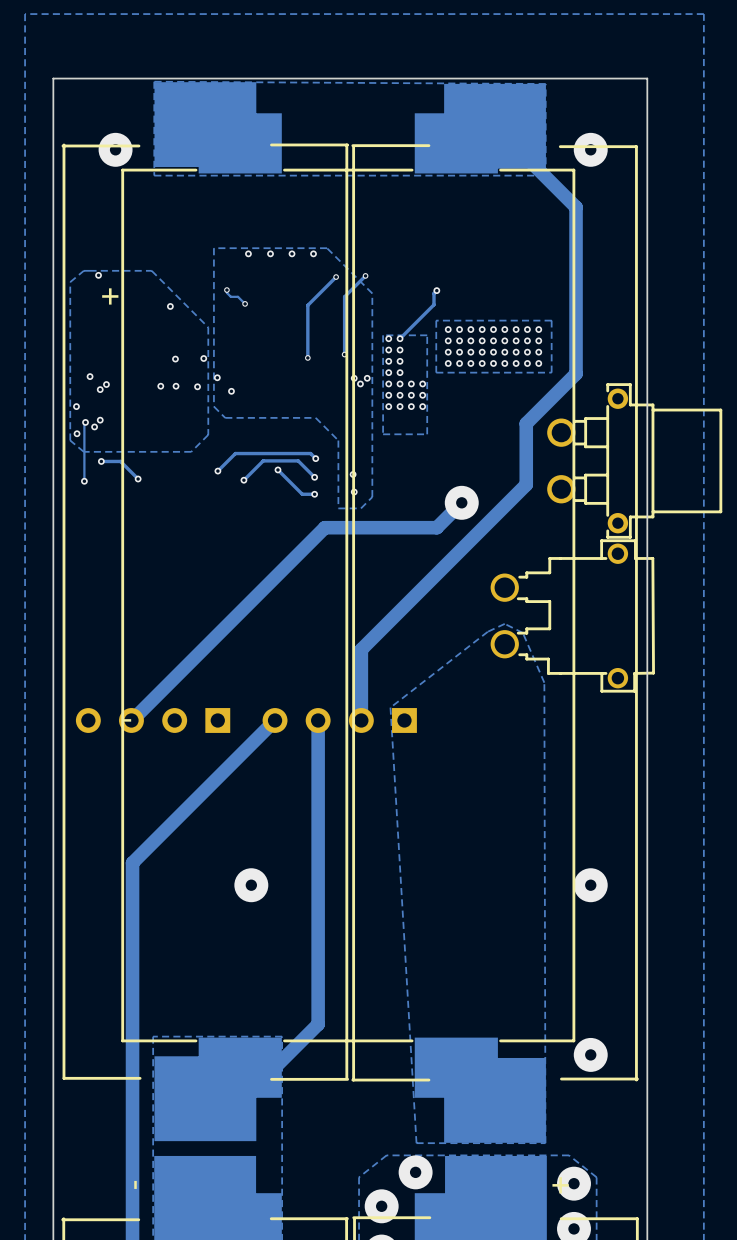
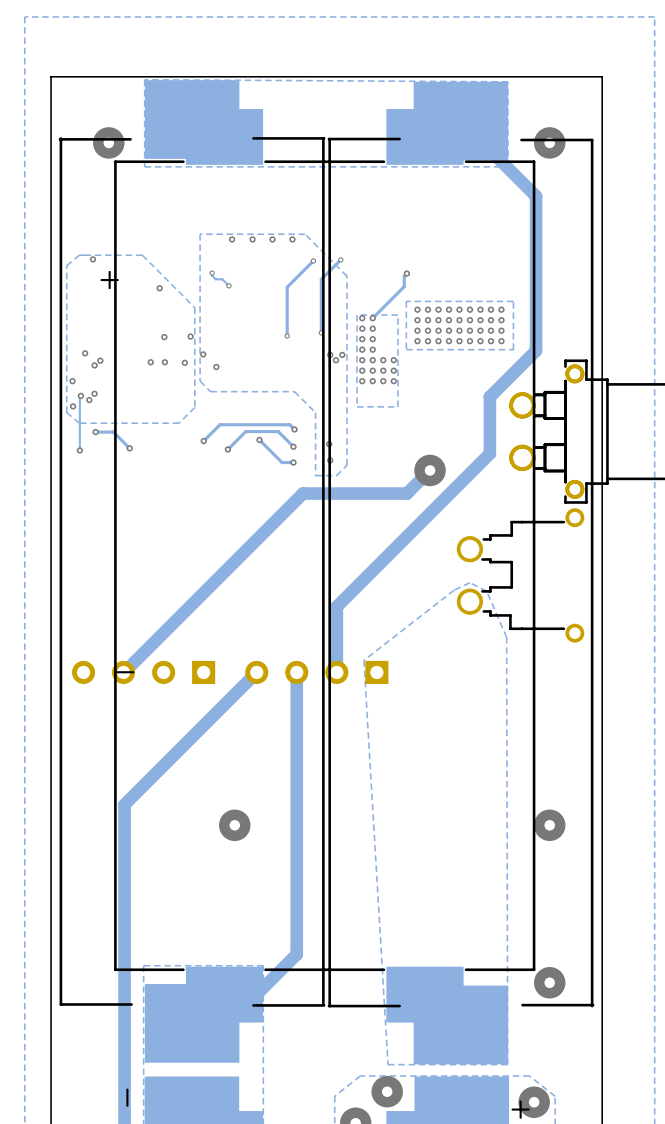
part: none -> (546, 431)
part: none -> (520, 575)
part: (572, 615) -> none

